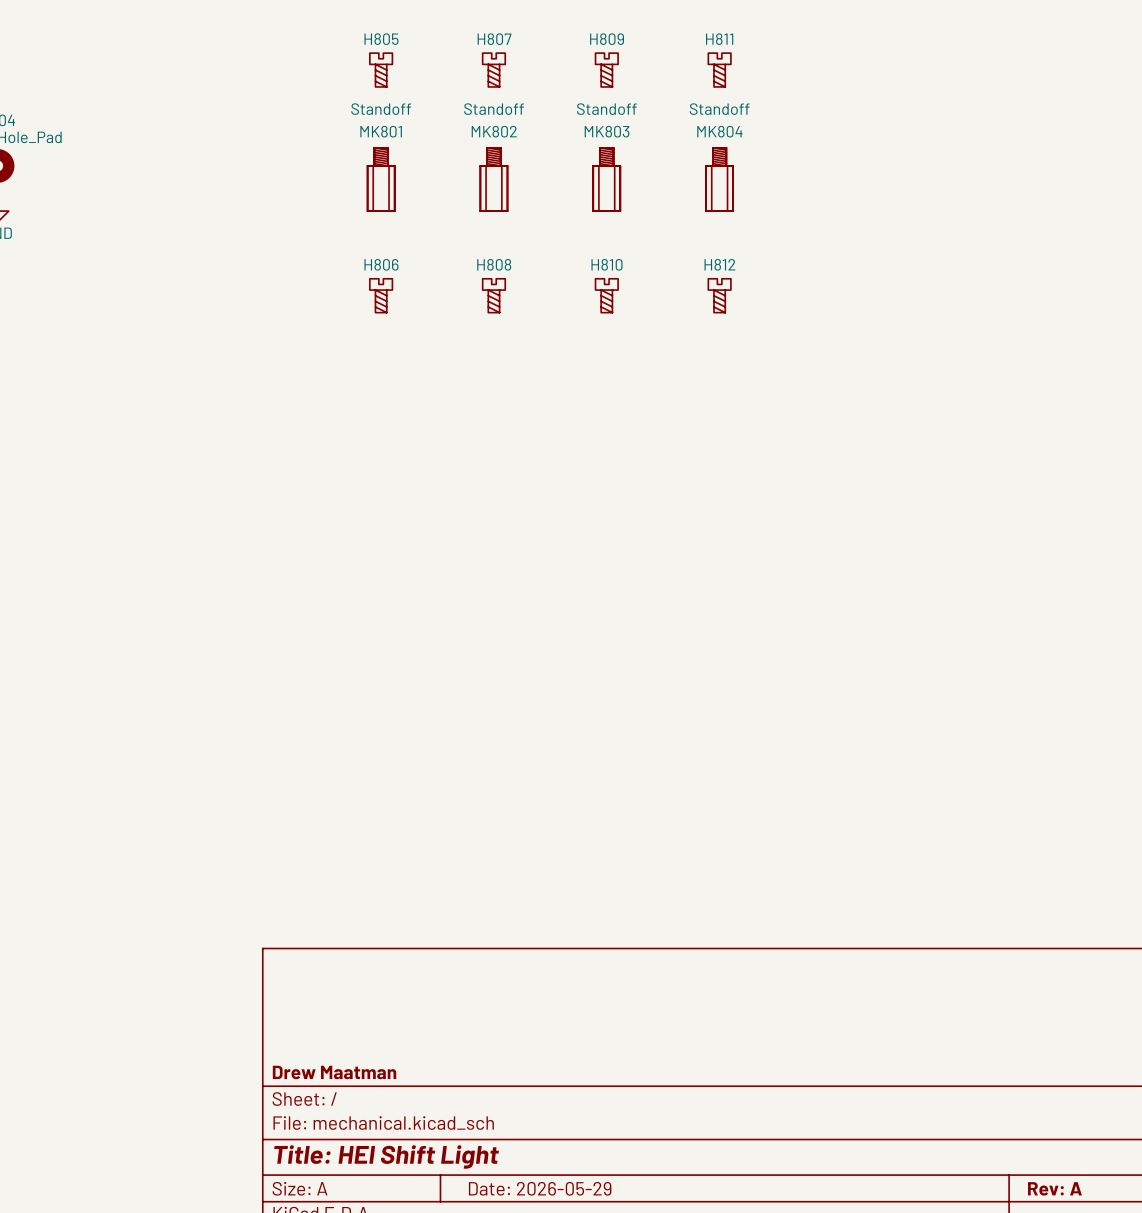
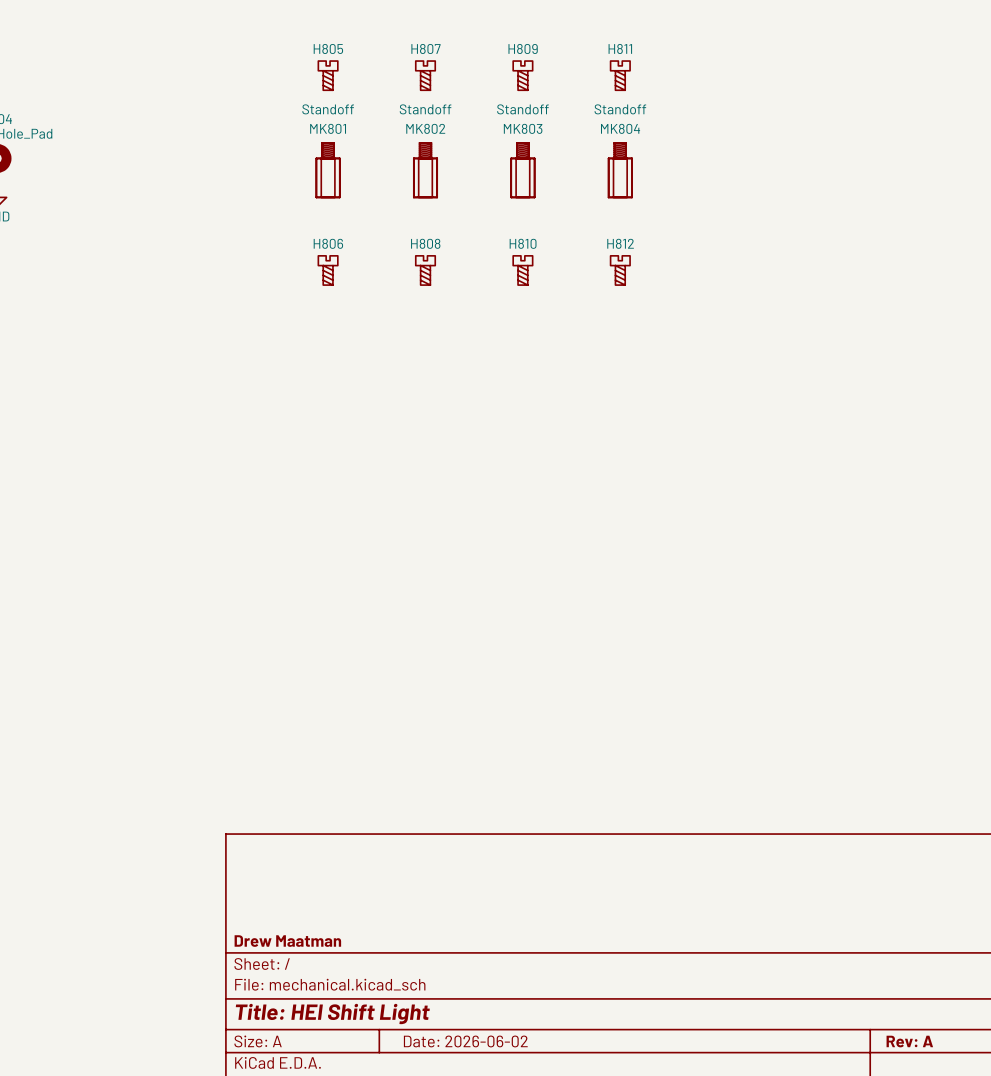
title block: Date: 2026-05-29 (540, 1188) -> Date: 2026-06-02 (465, 1041)

